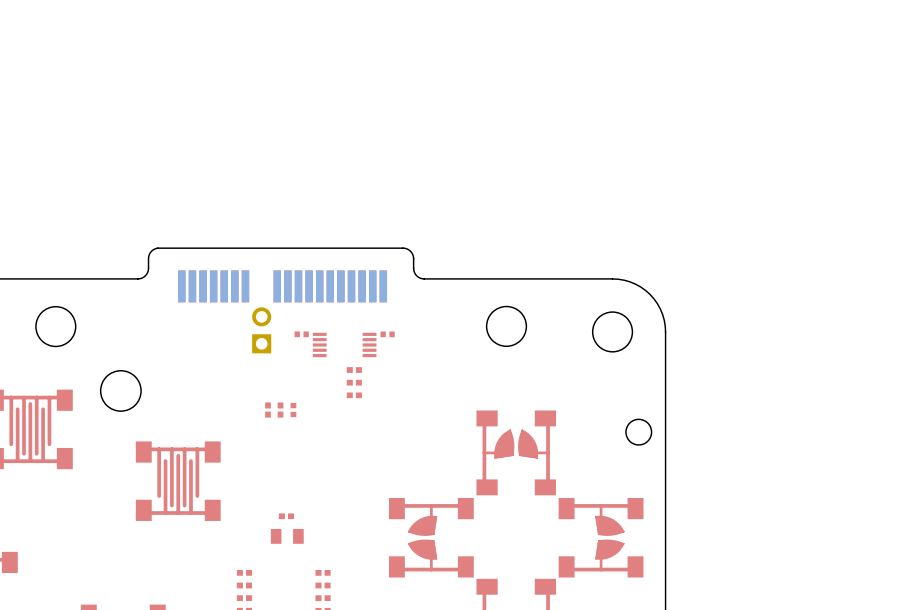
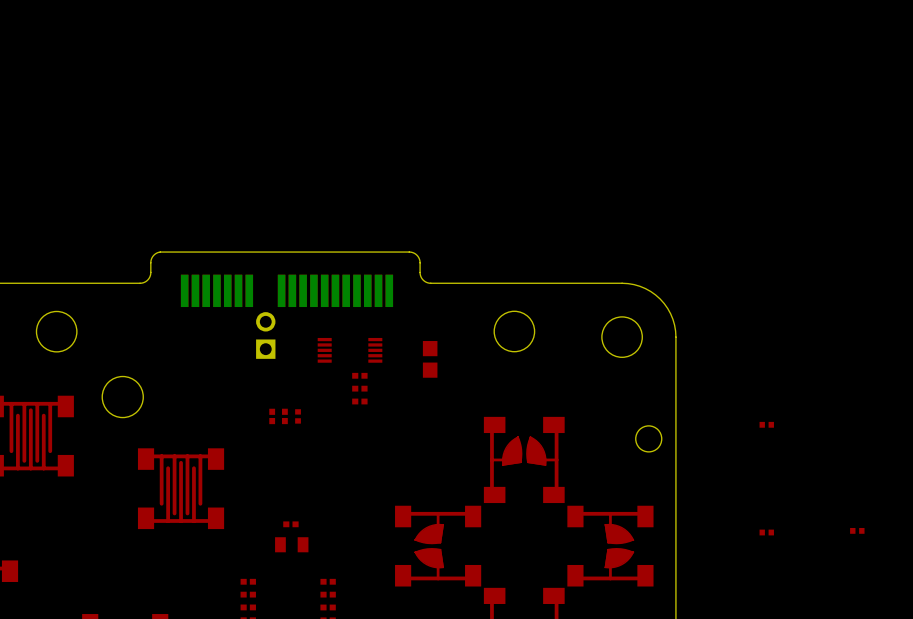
part: (301, 334) -> none
part: (387, 334) -> none
part: none -> (430, 359)
part: none -> (766, 424)
part: none -> (857, 530)
part: none -> (766, 532)

